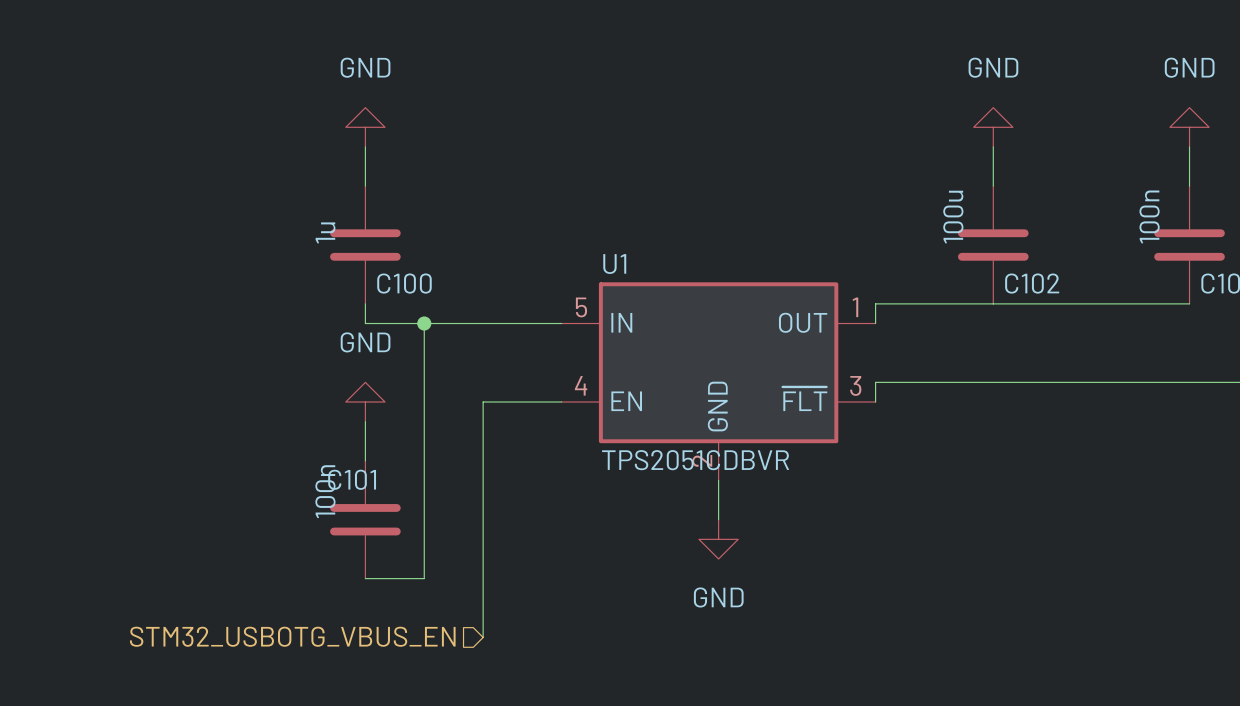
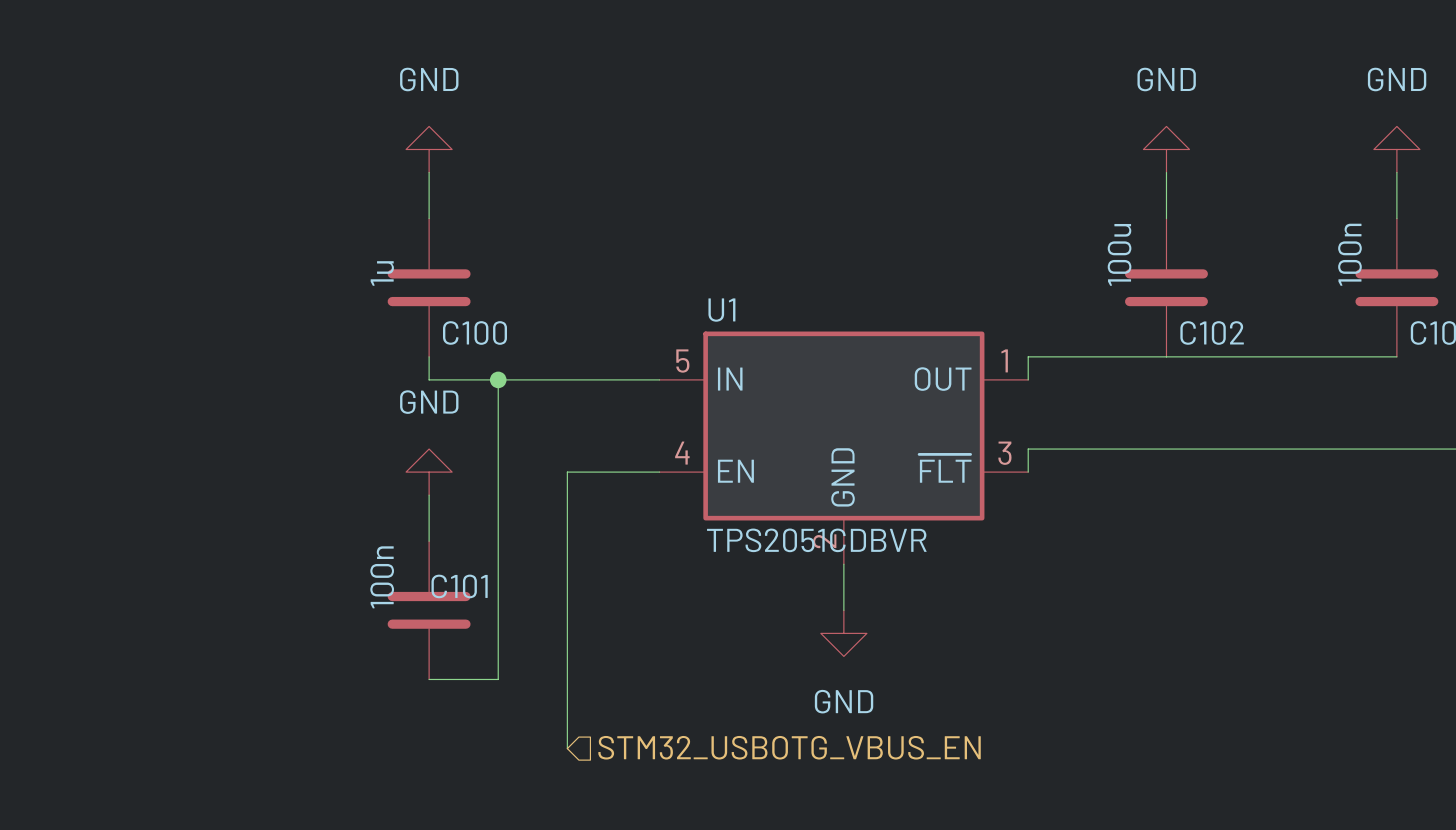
C101 name position: C101 (352, 479) -> C101 (459, 586)
hierarchical label rotation: 0° (292, 636) -> 180° (789, 747)
hierarchical label position: STM32_USBOTG_VBUS_EN (292, 636) -> STM32_USBOTG_VBUS_EN (789, 747)

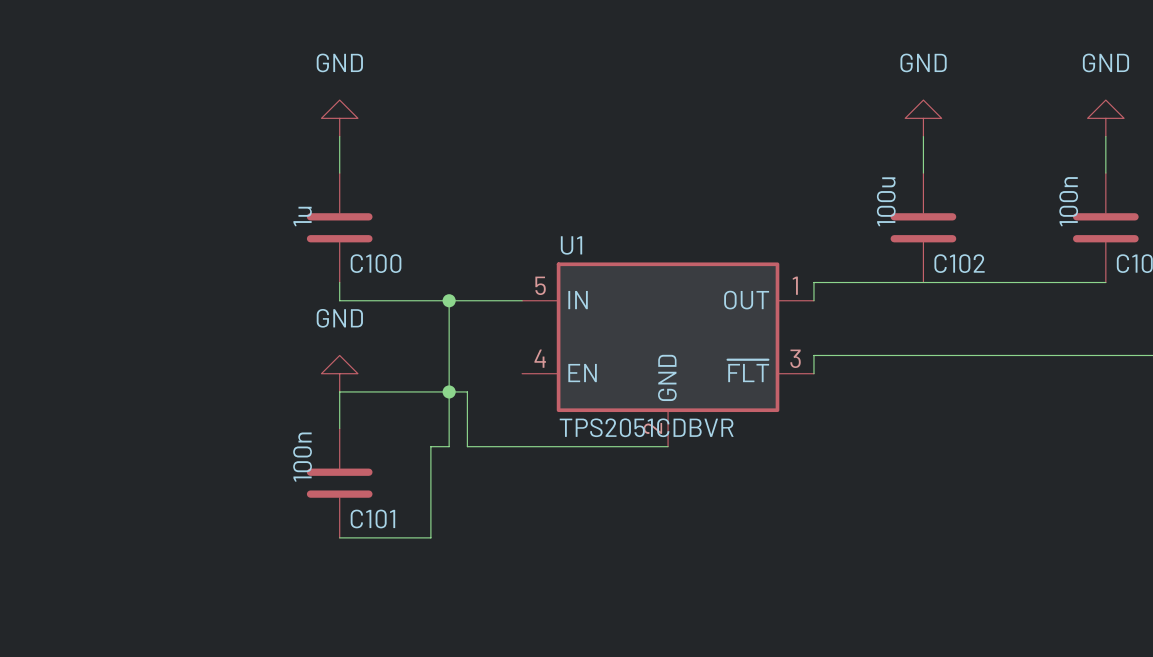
wire: (498, 379) (498, 679) -> none
junction: (498, 379) -> none
junction: none -> (449, 300)
wire: (567, 472) (659, 472) -> (449, 373) (449, 300)
junction: none -> (449, 391)
wire: (567, 564) (567, 748) -> (449, 446) (430, 446) (430, 537) (394, 537)
wire: (843, 564) (843, 610) -> (668, 446) (467, 446) (467, 391) (339, 391)
C101 name position: C101 (459, 586) -> C101 (372, 518)
power symbol: GND (843, 633) -> none
hierarchical label: STM32_USBOTG_VBUS_EN (789, 747) -> none

